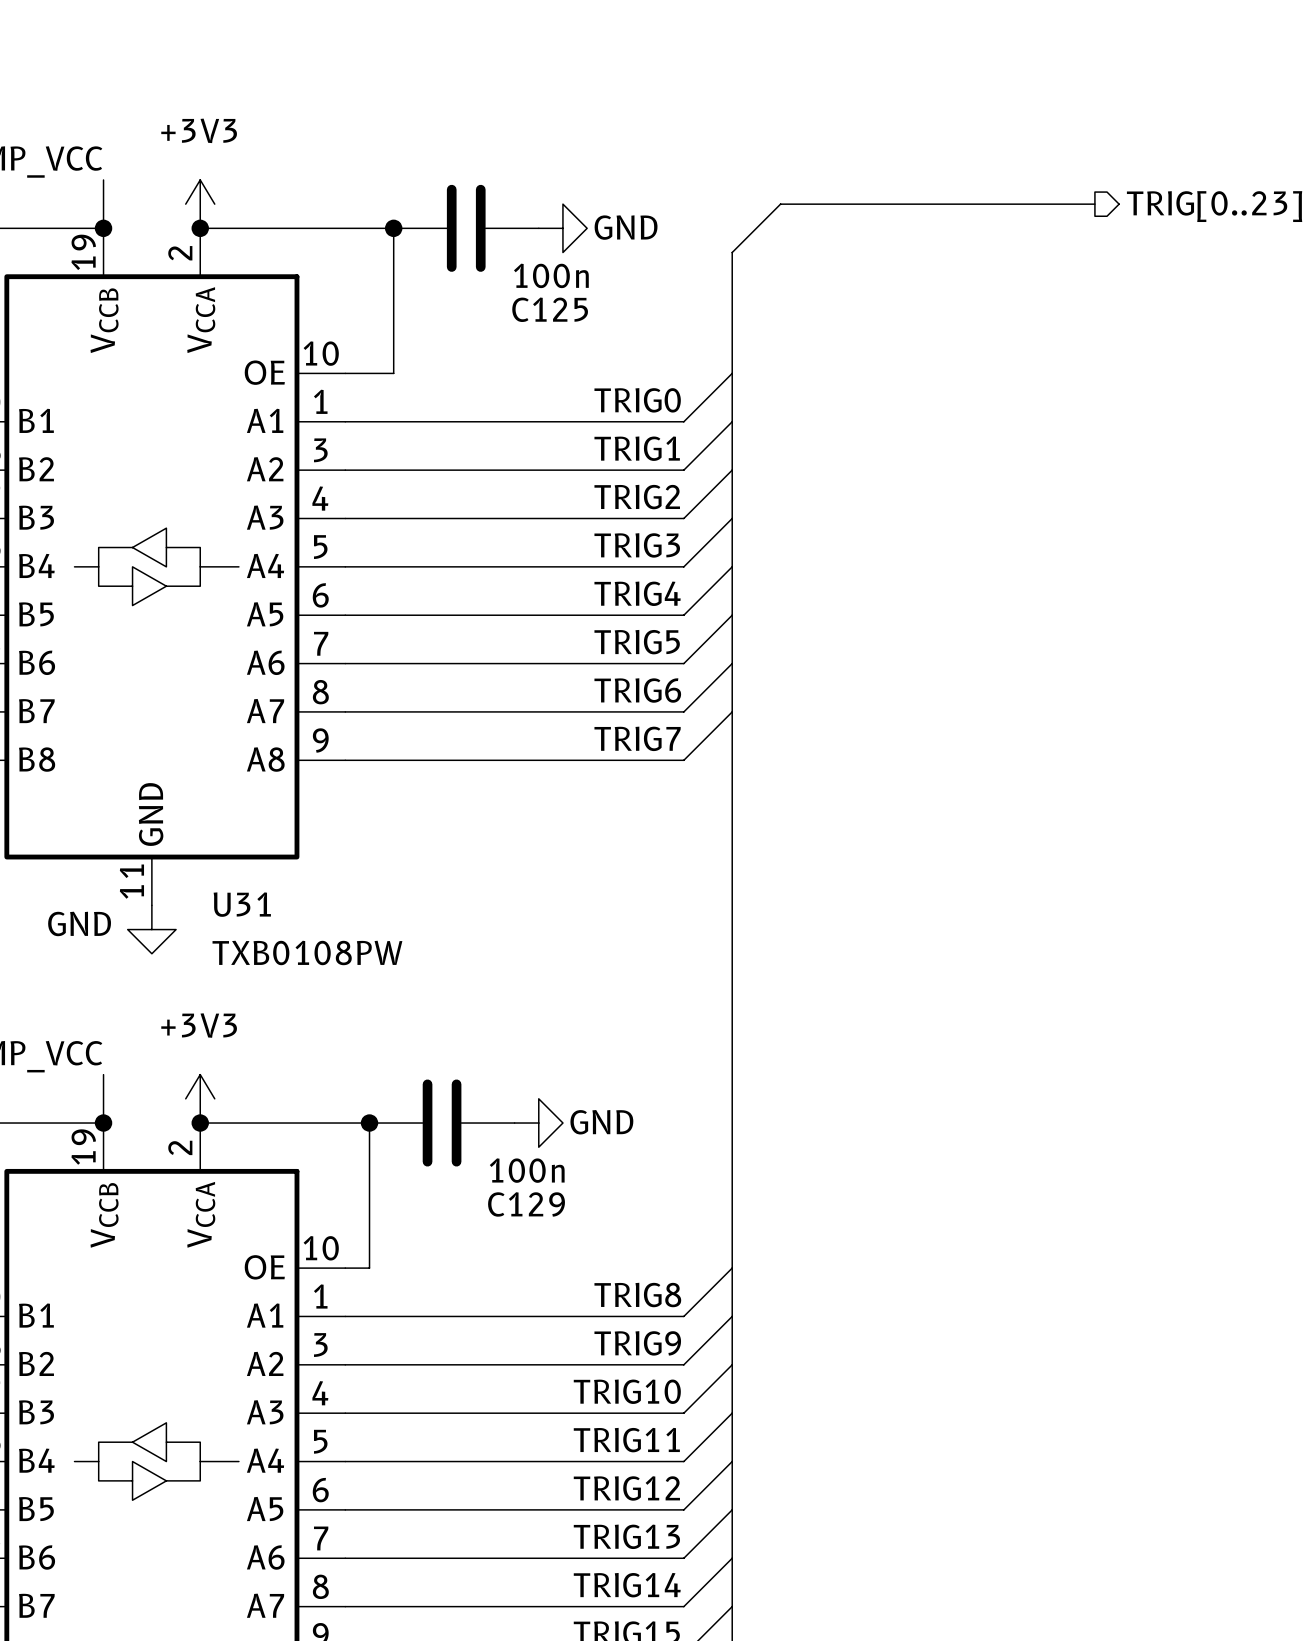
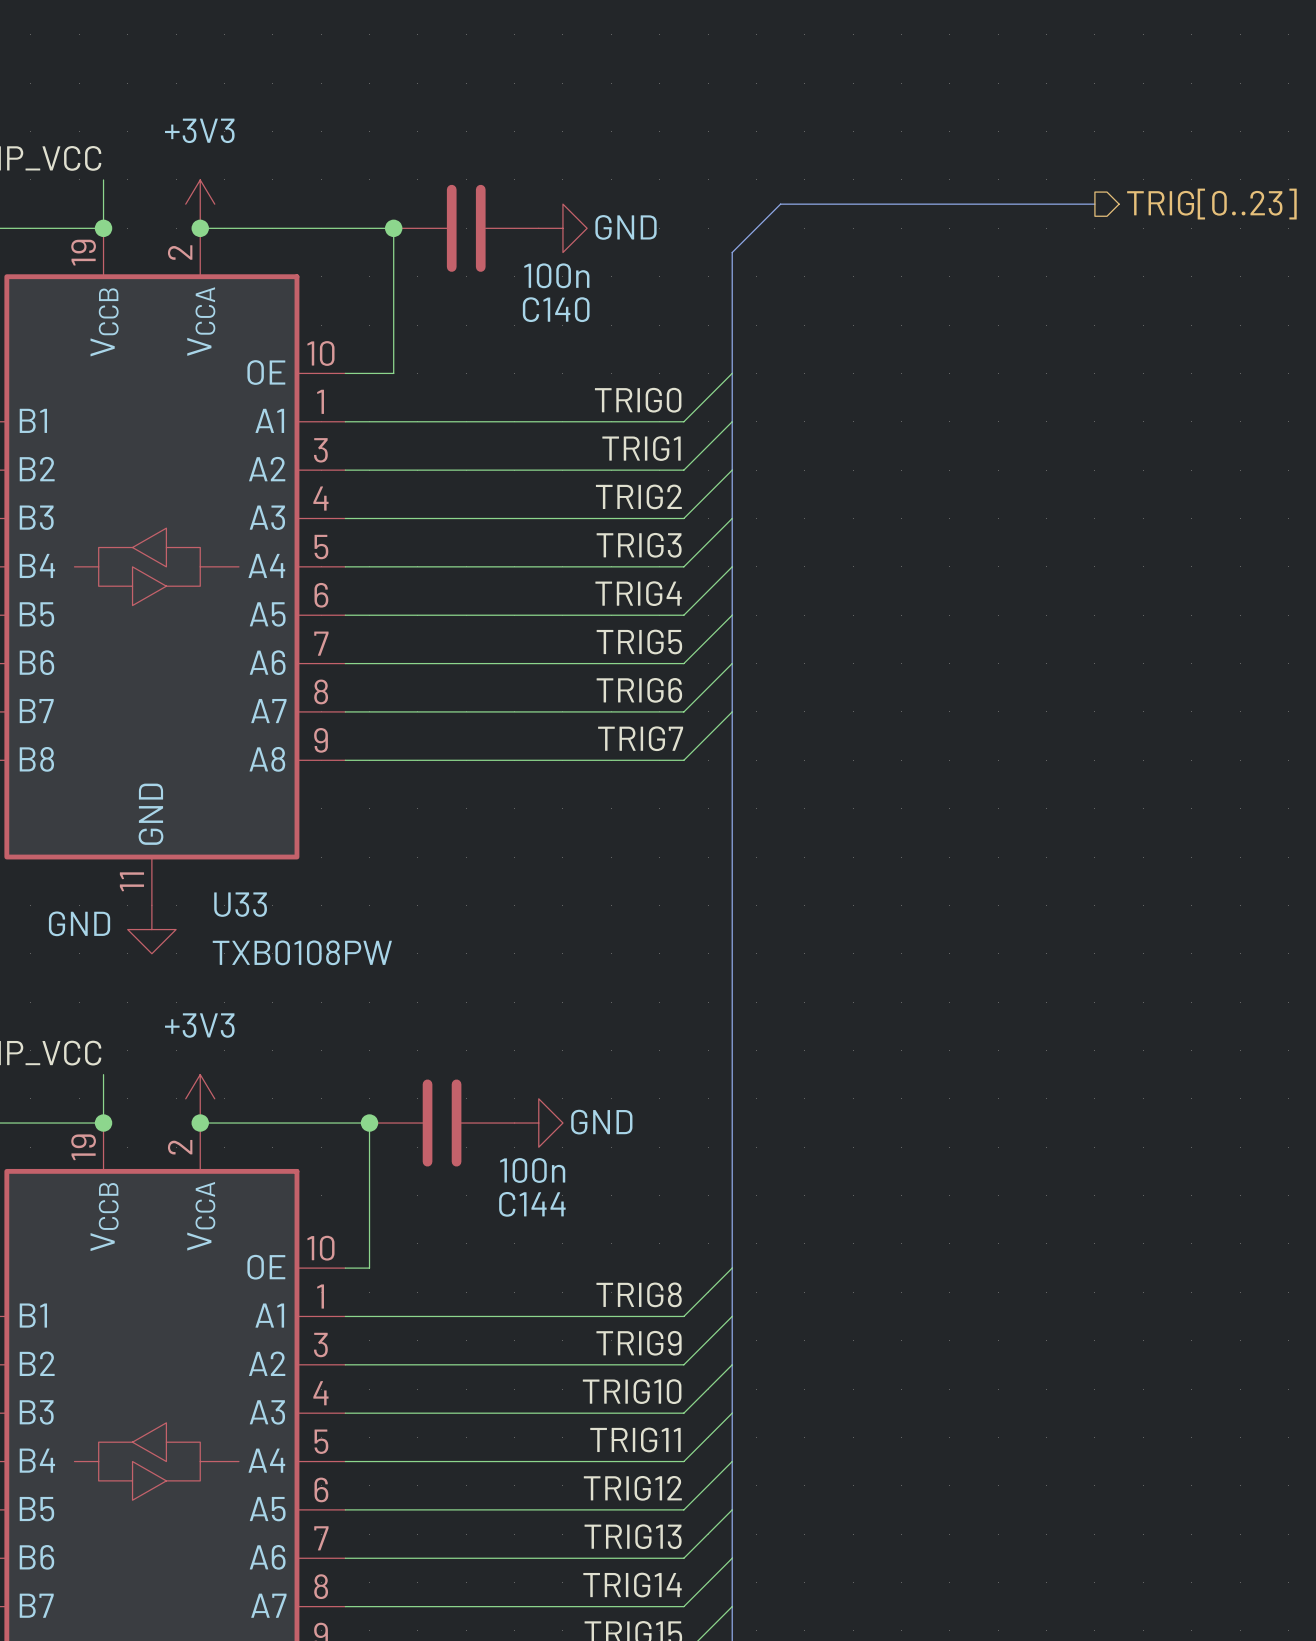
C125 name: C125 (550, 309) -> C140 (556, 309)
U31 name: U31 (242, 904) -> U33 (240, 904)
C129 name: C129 (526, 1204) -> C144 (532, 1204)

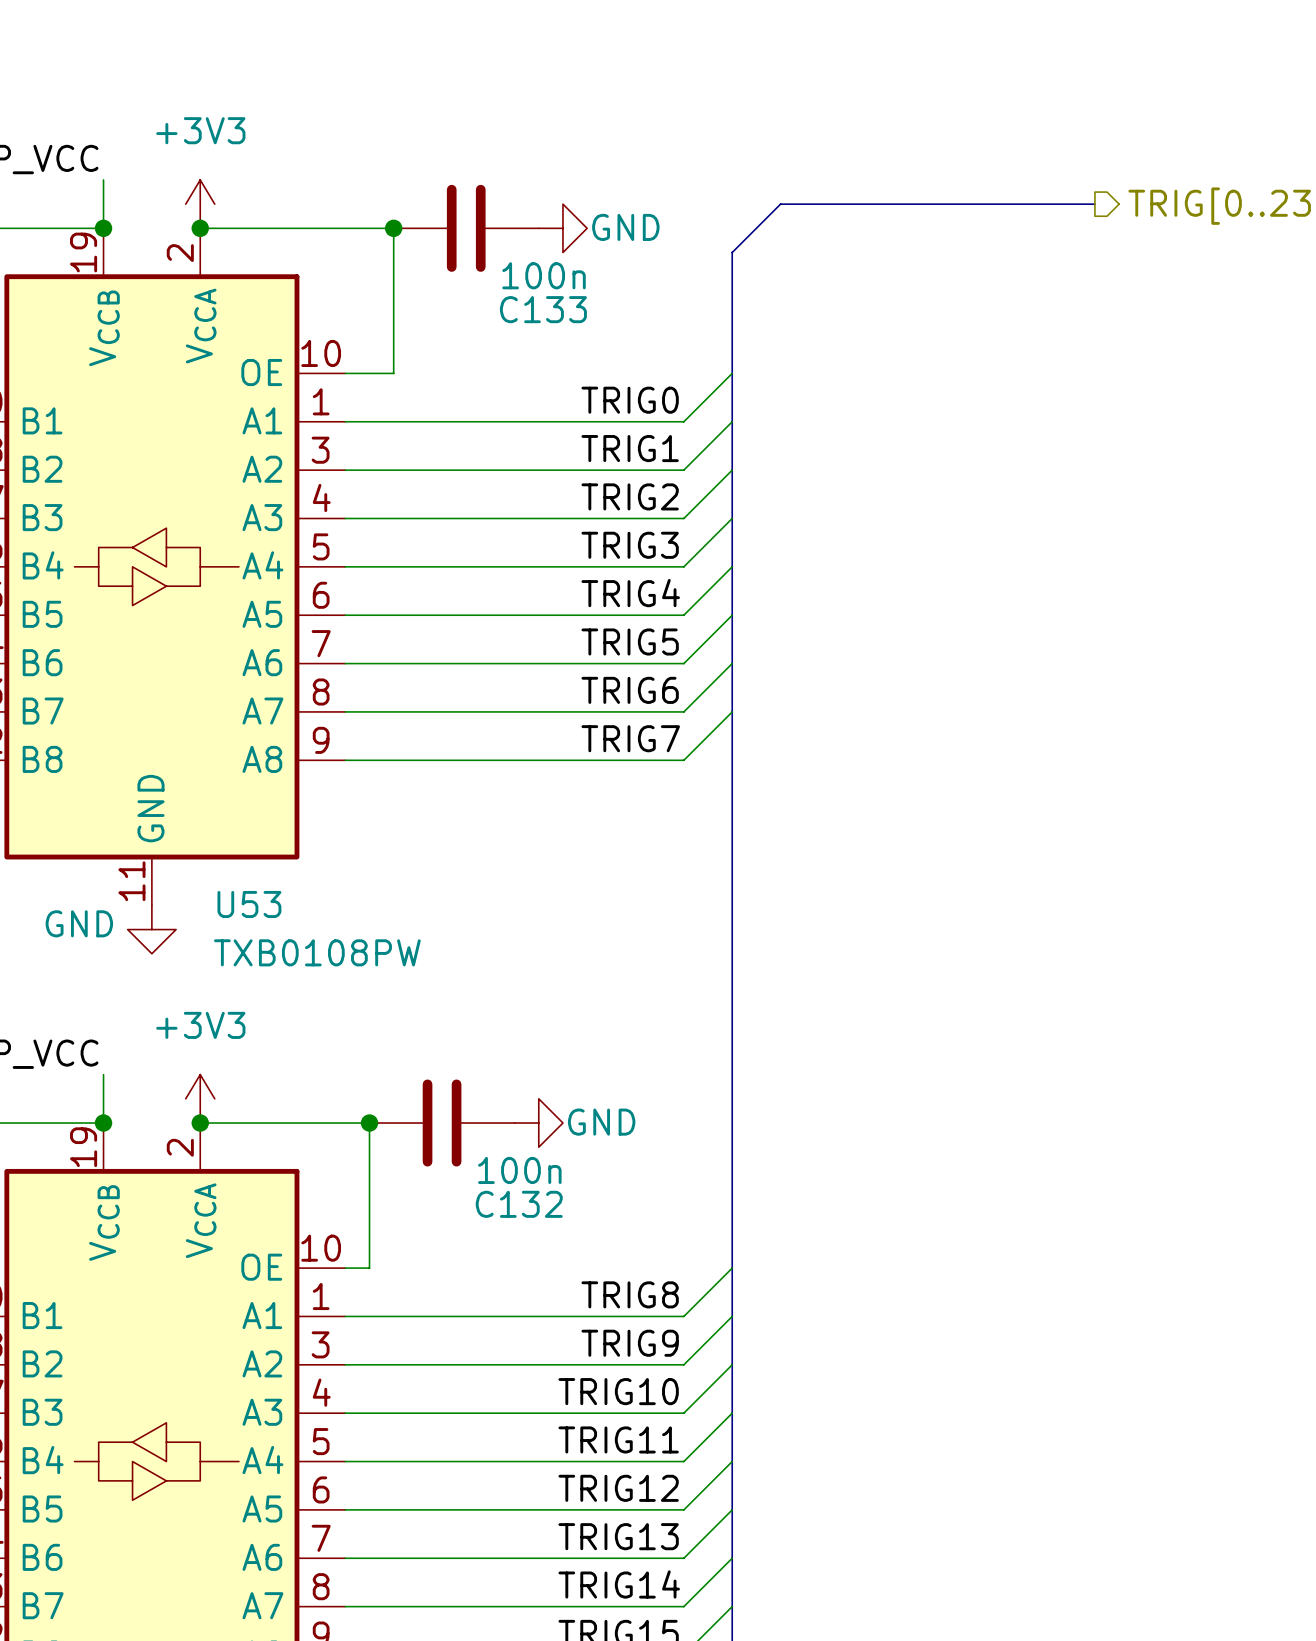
C140 name: C140 (556, 309) -> C133 (543, 309)
U33 name: U33 (240, 904) -> U53 (249, 904)
C144 name: C144 (532, 1204) -> C132 (519, 1204)

